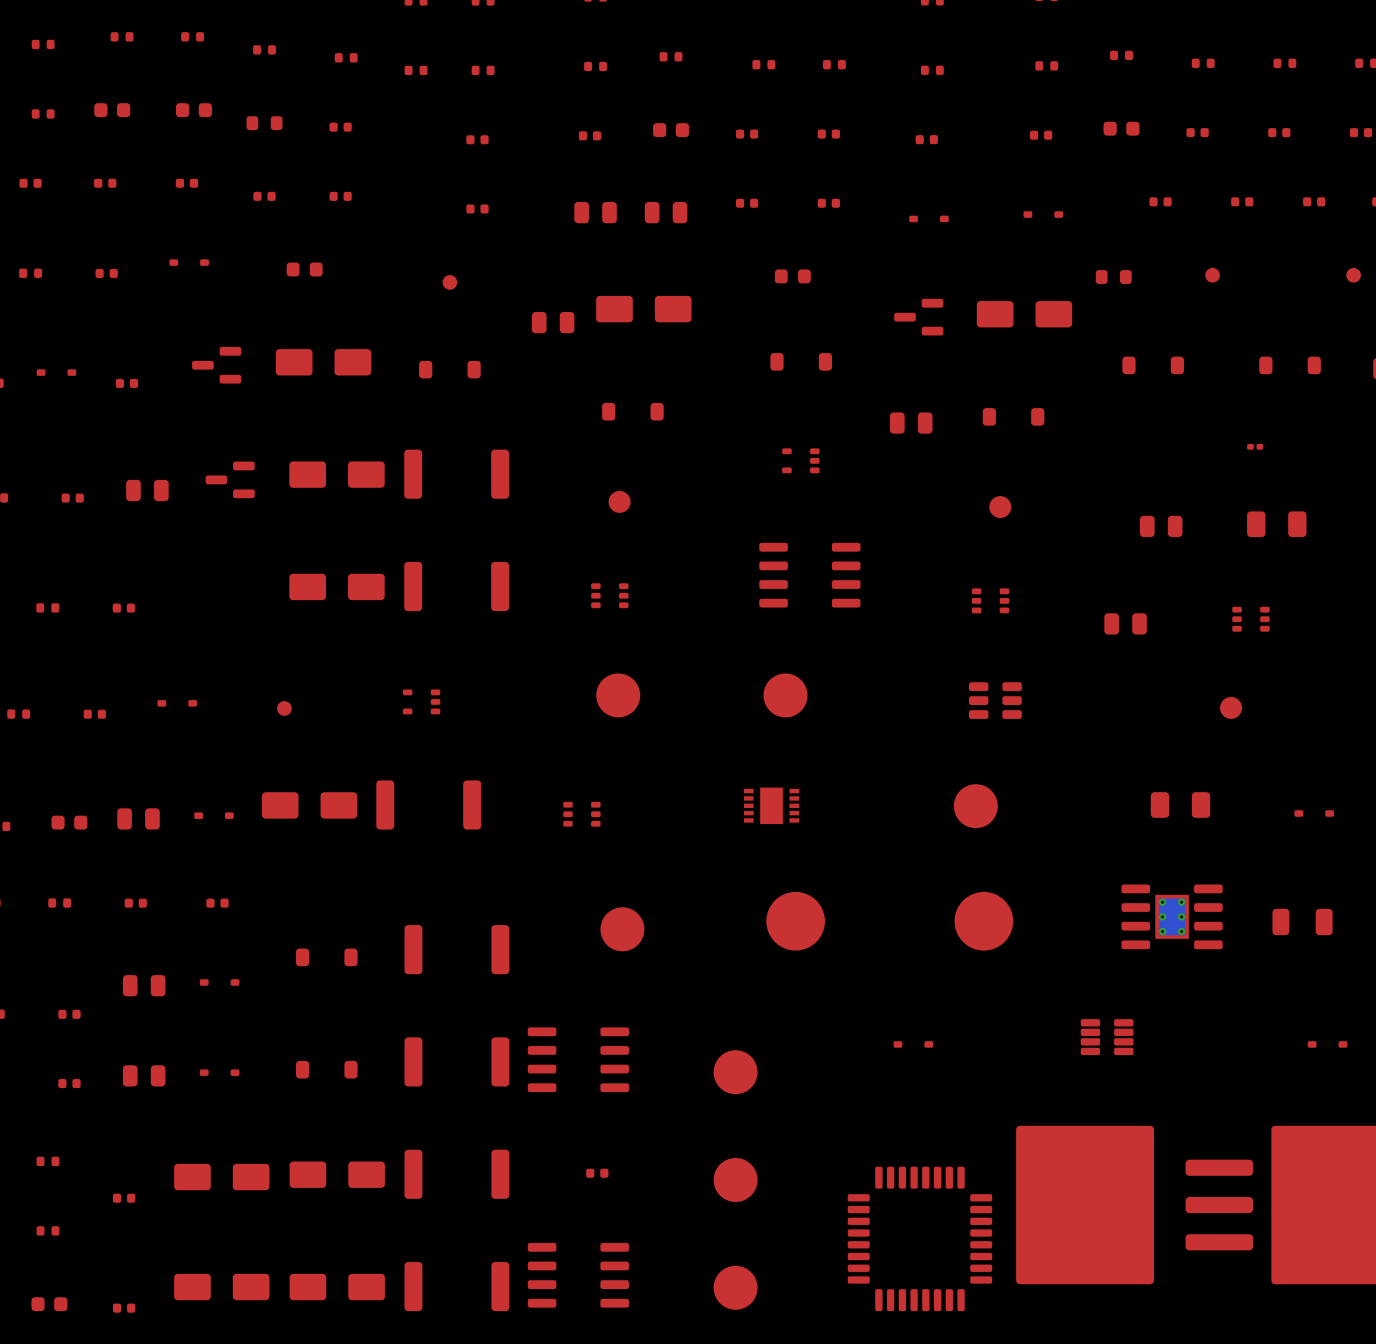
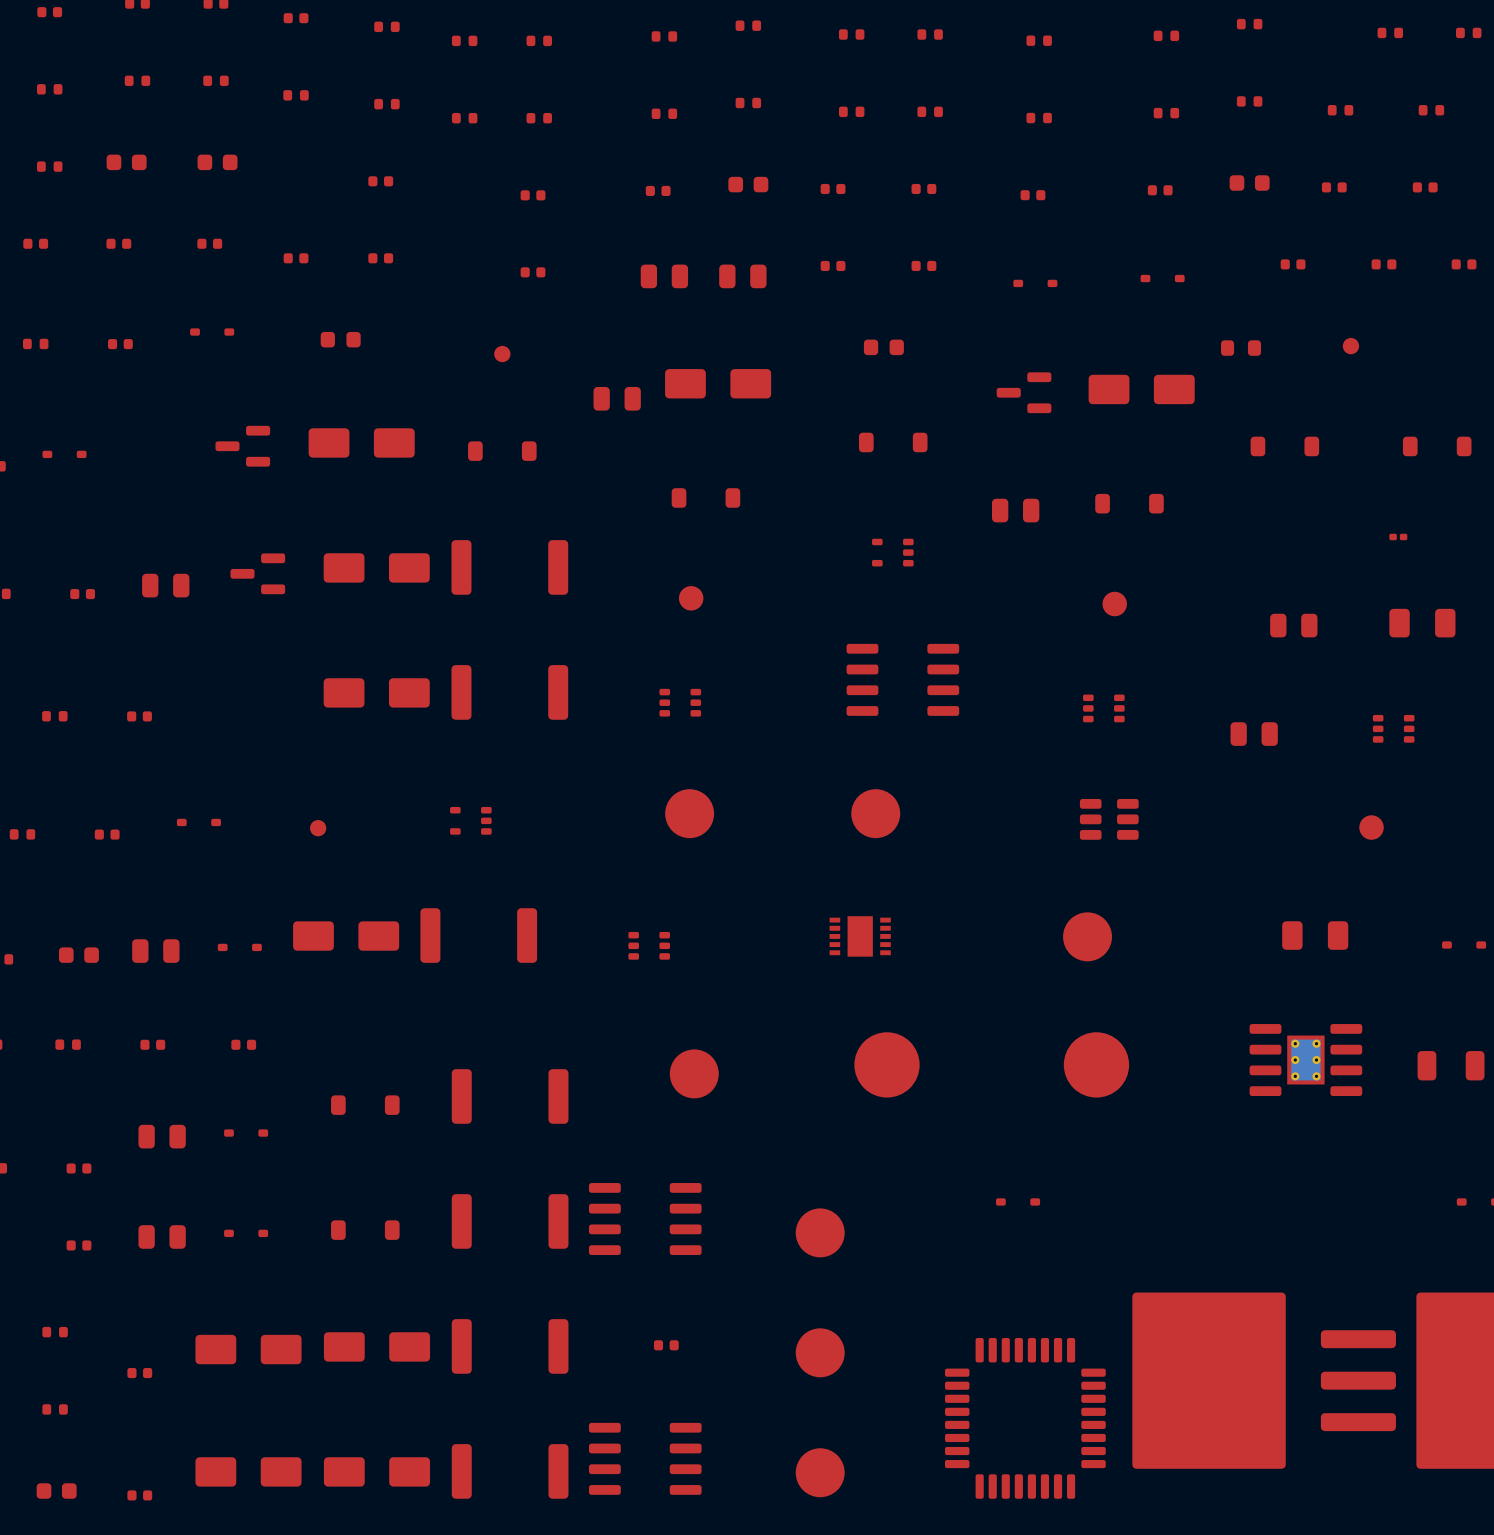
part: (264, 123) -> none
part: (126, 383) -> none
part: (1107, 1037) -> none

